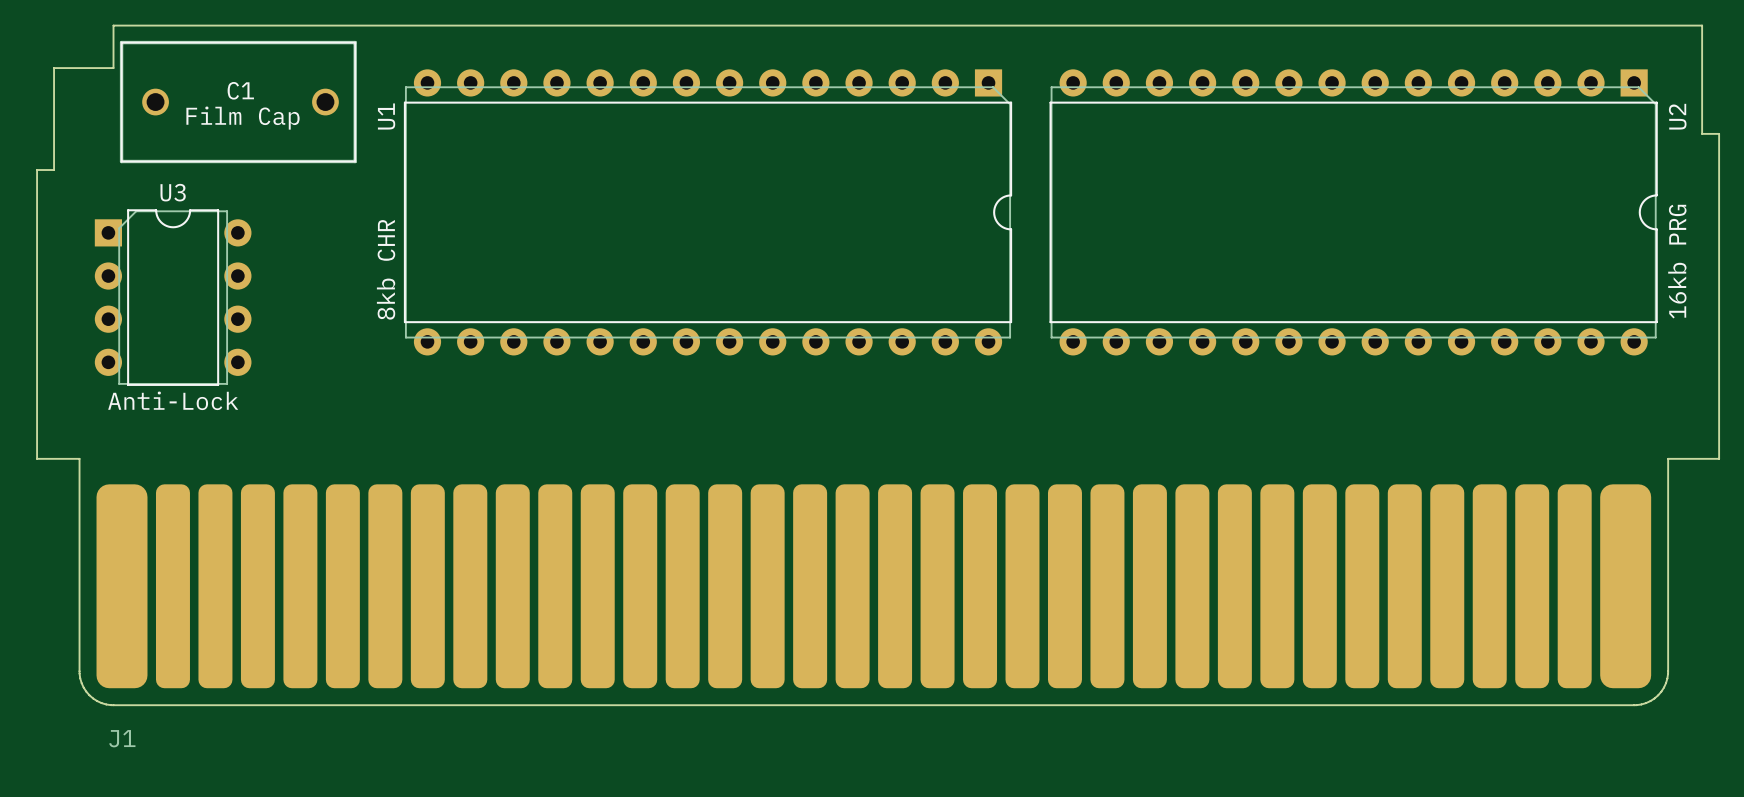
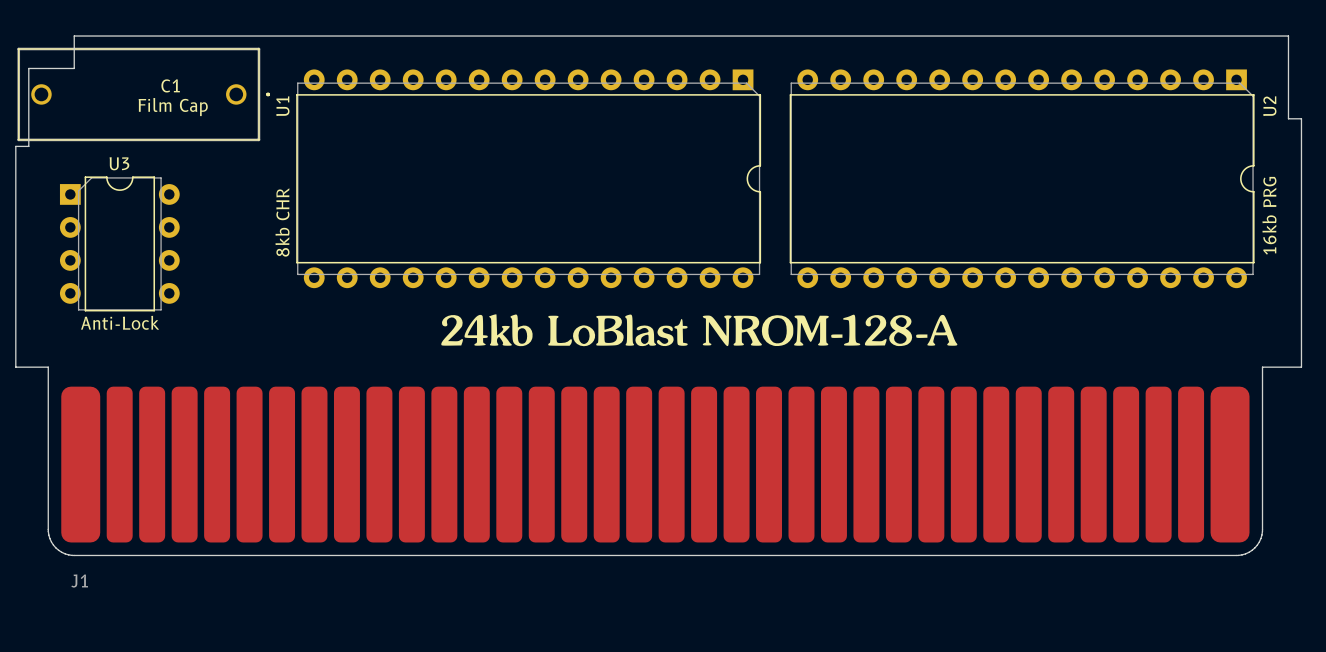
C1 footprint: [119, 40, 357, 164] -> [17, 47, 271, 142]
drawing: none -> [441, 314, 958, 347]

